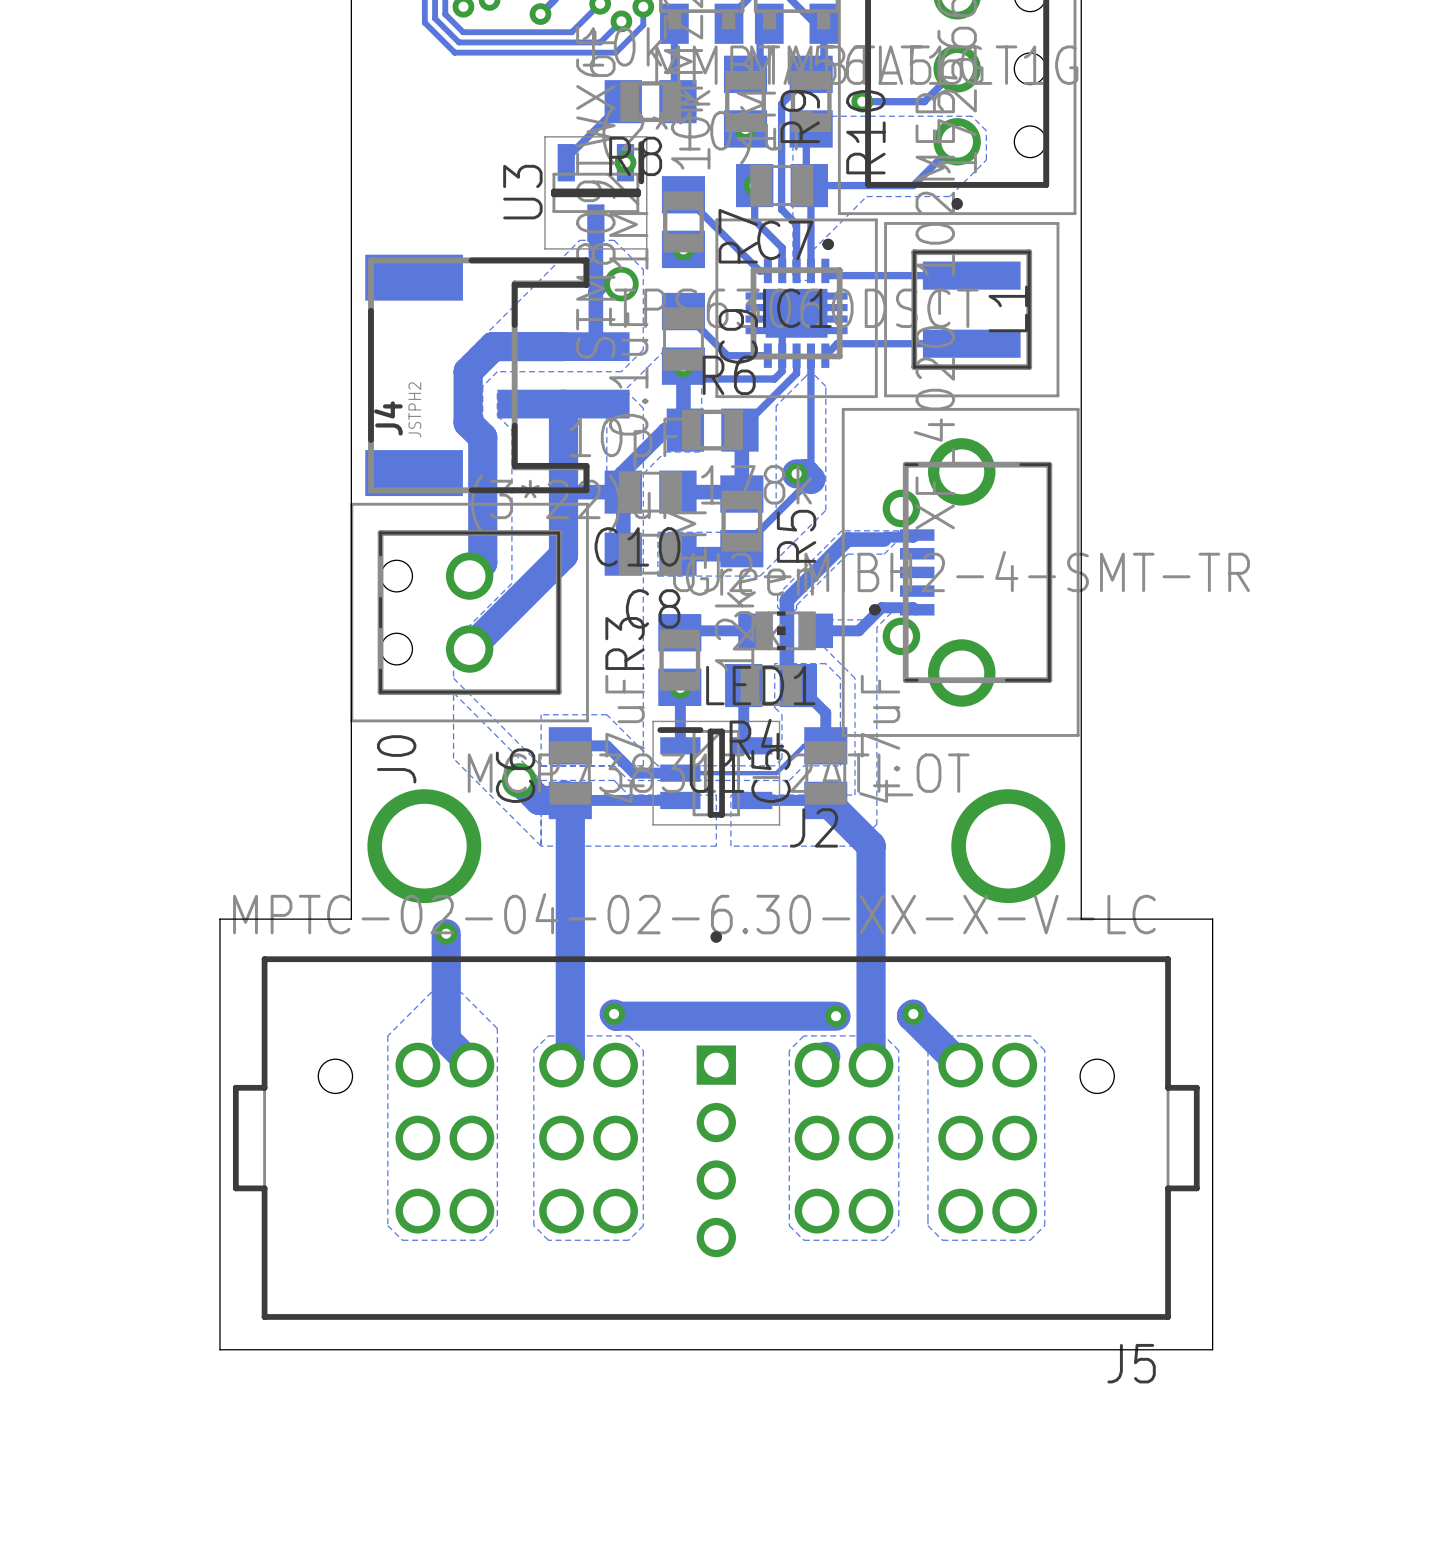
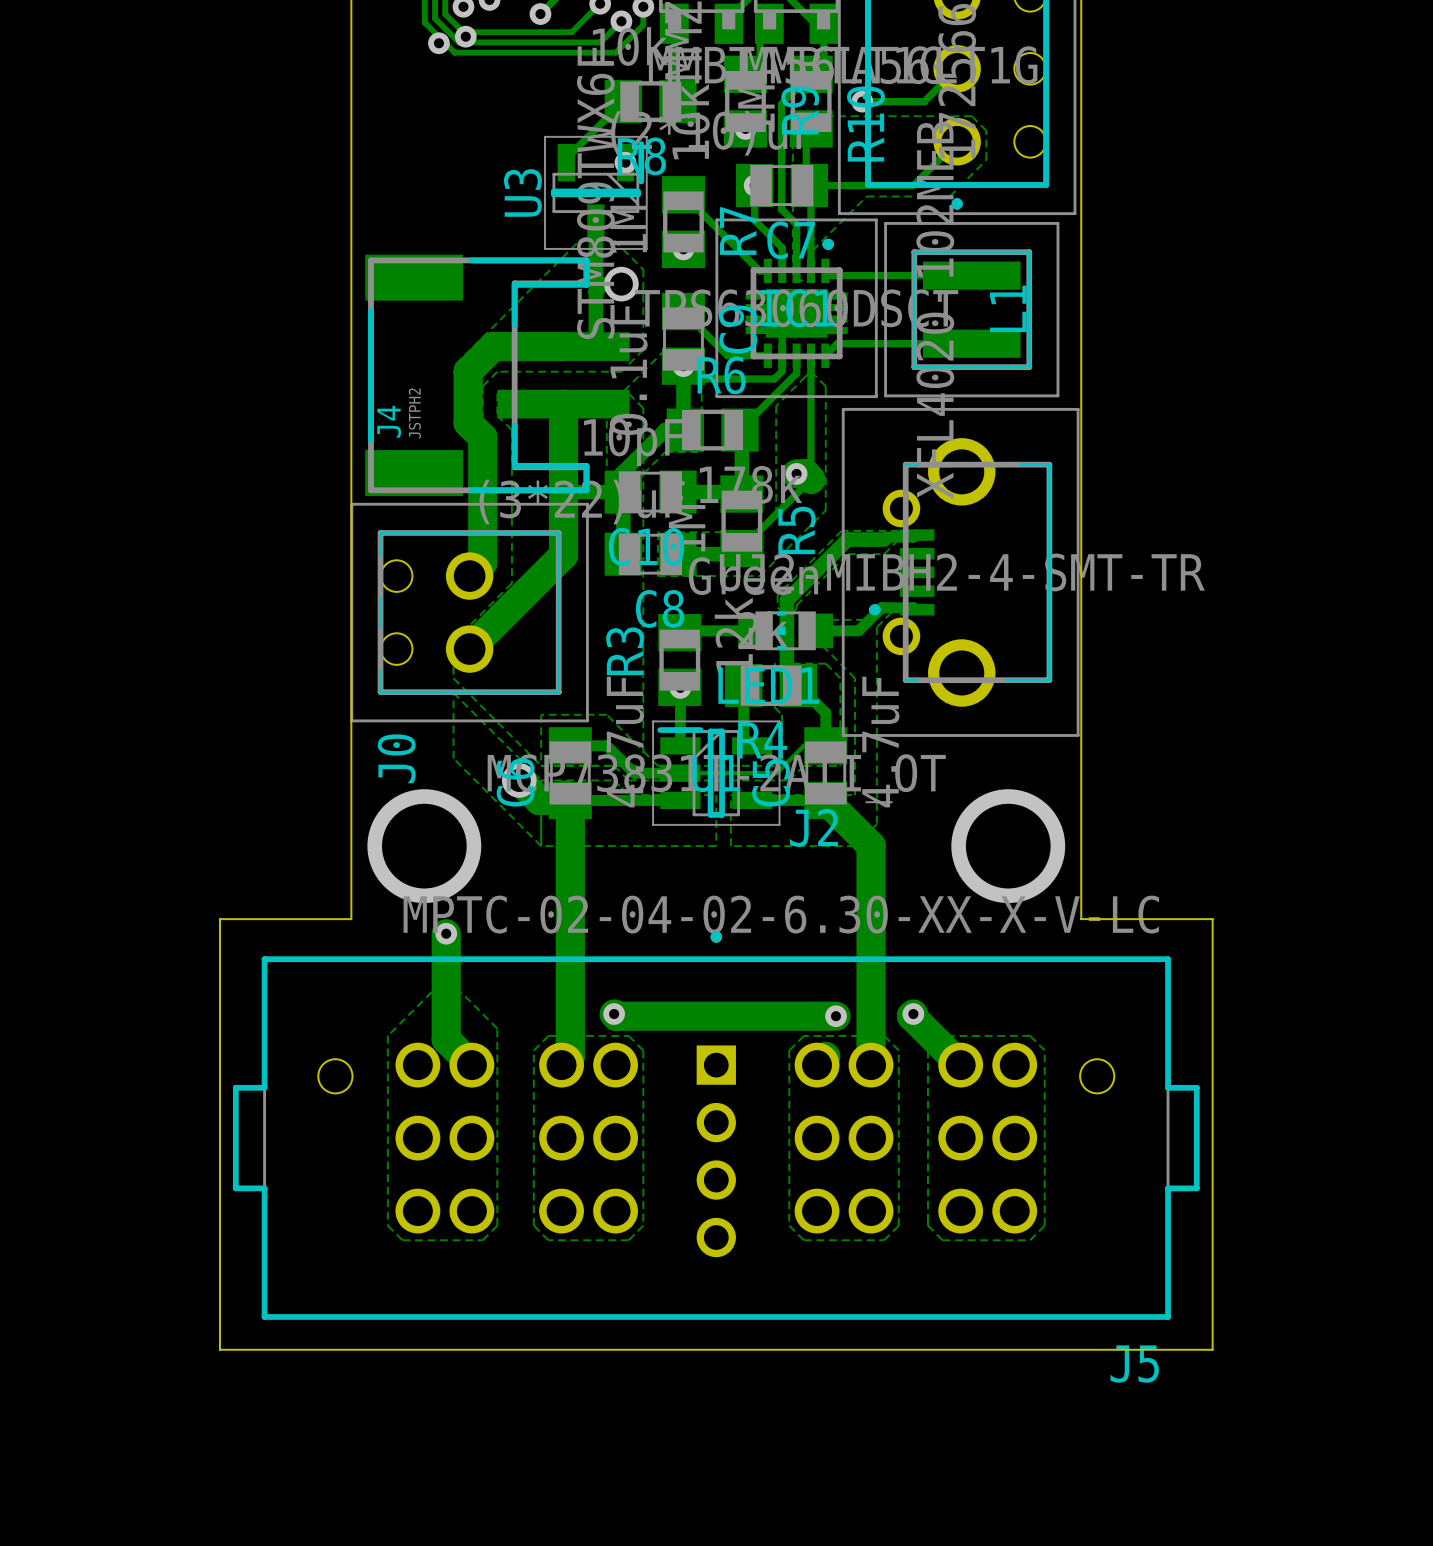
via: none -> (465, 36)
via: none -> (438, 43)

